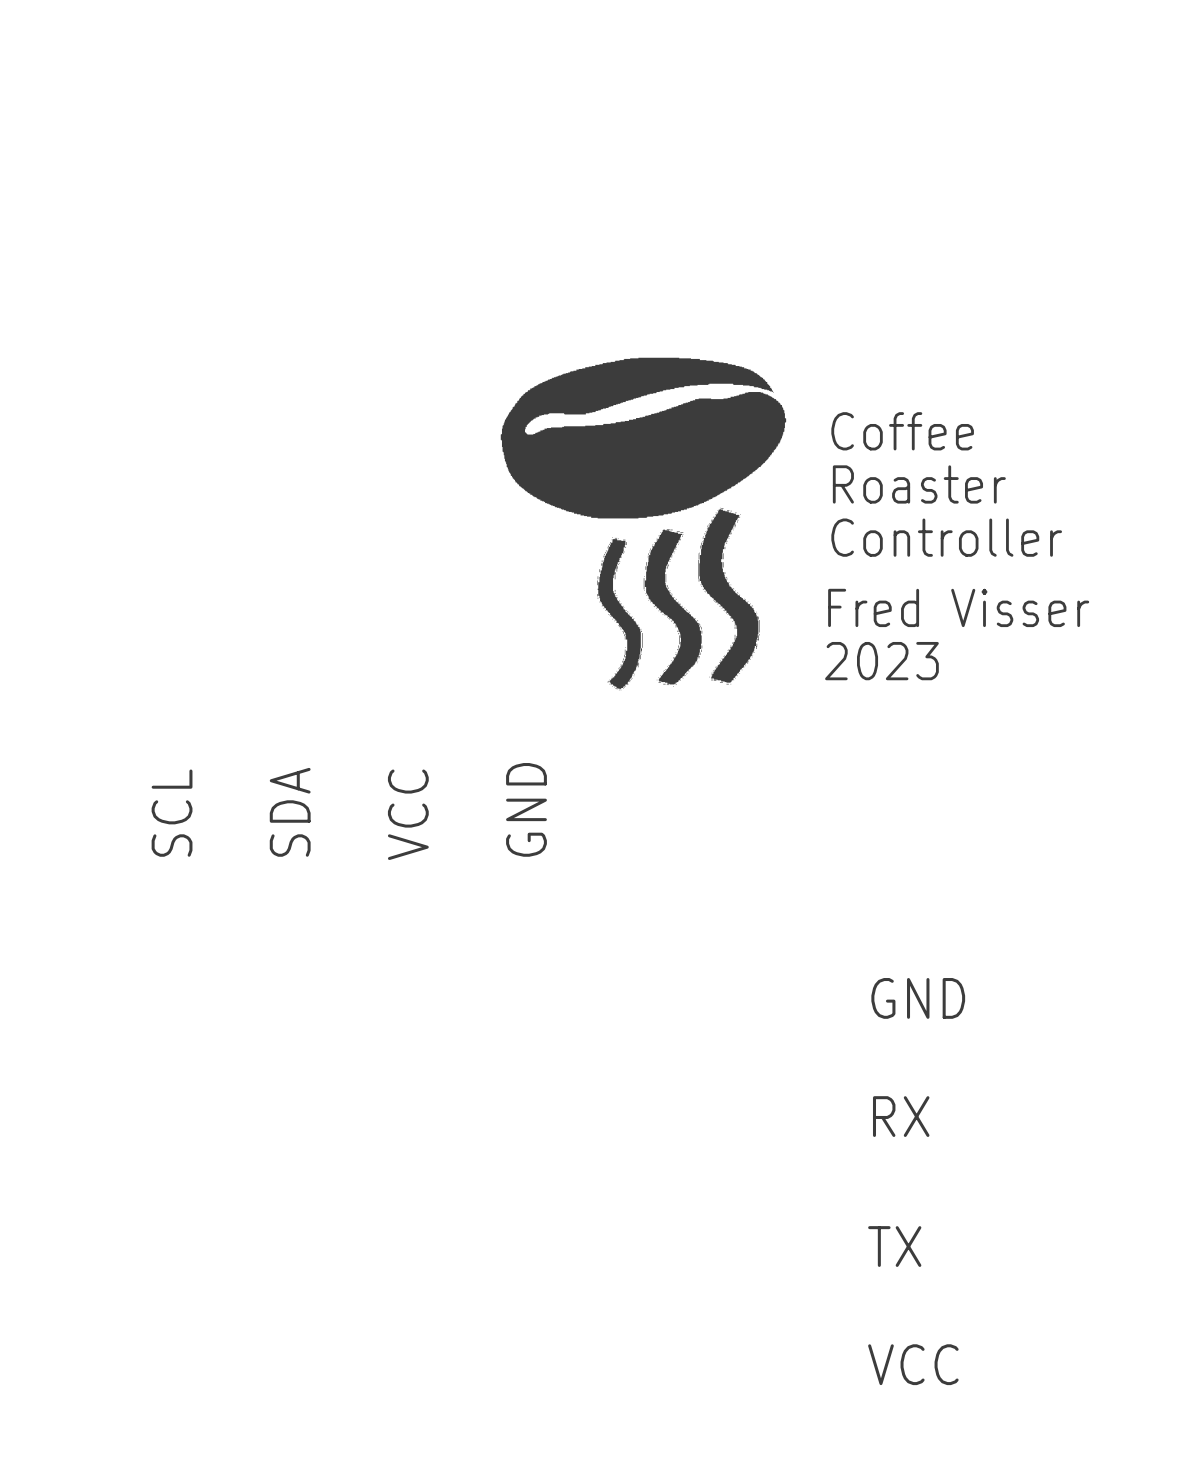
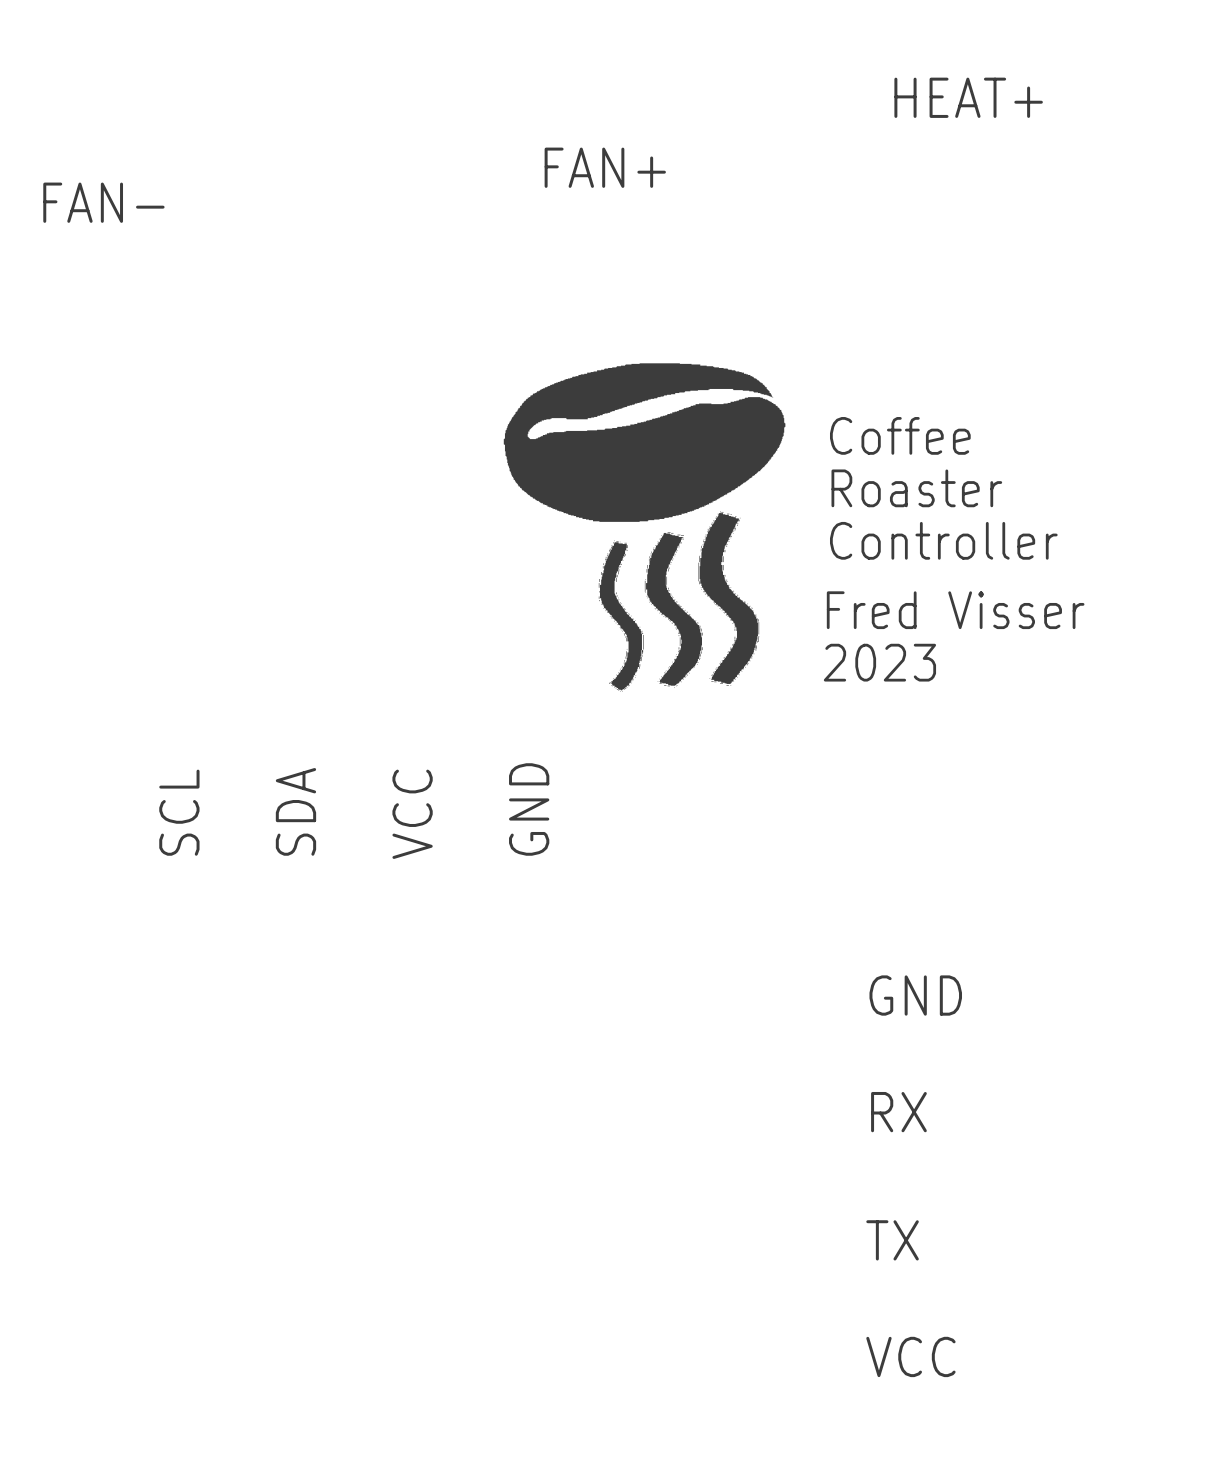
text: none -> HEAT+ (968, 97)
text: none -> FAN+ (605, 167)
text: none -> FAN- (103, 202)

